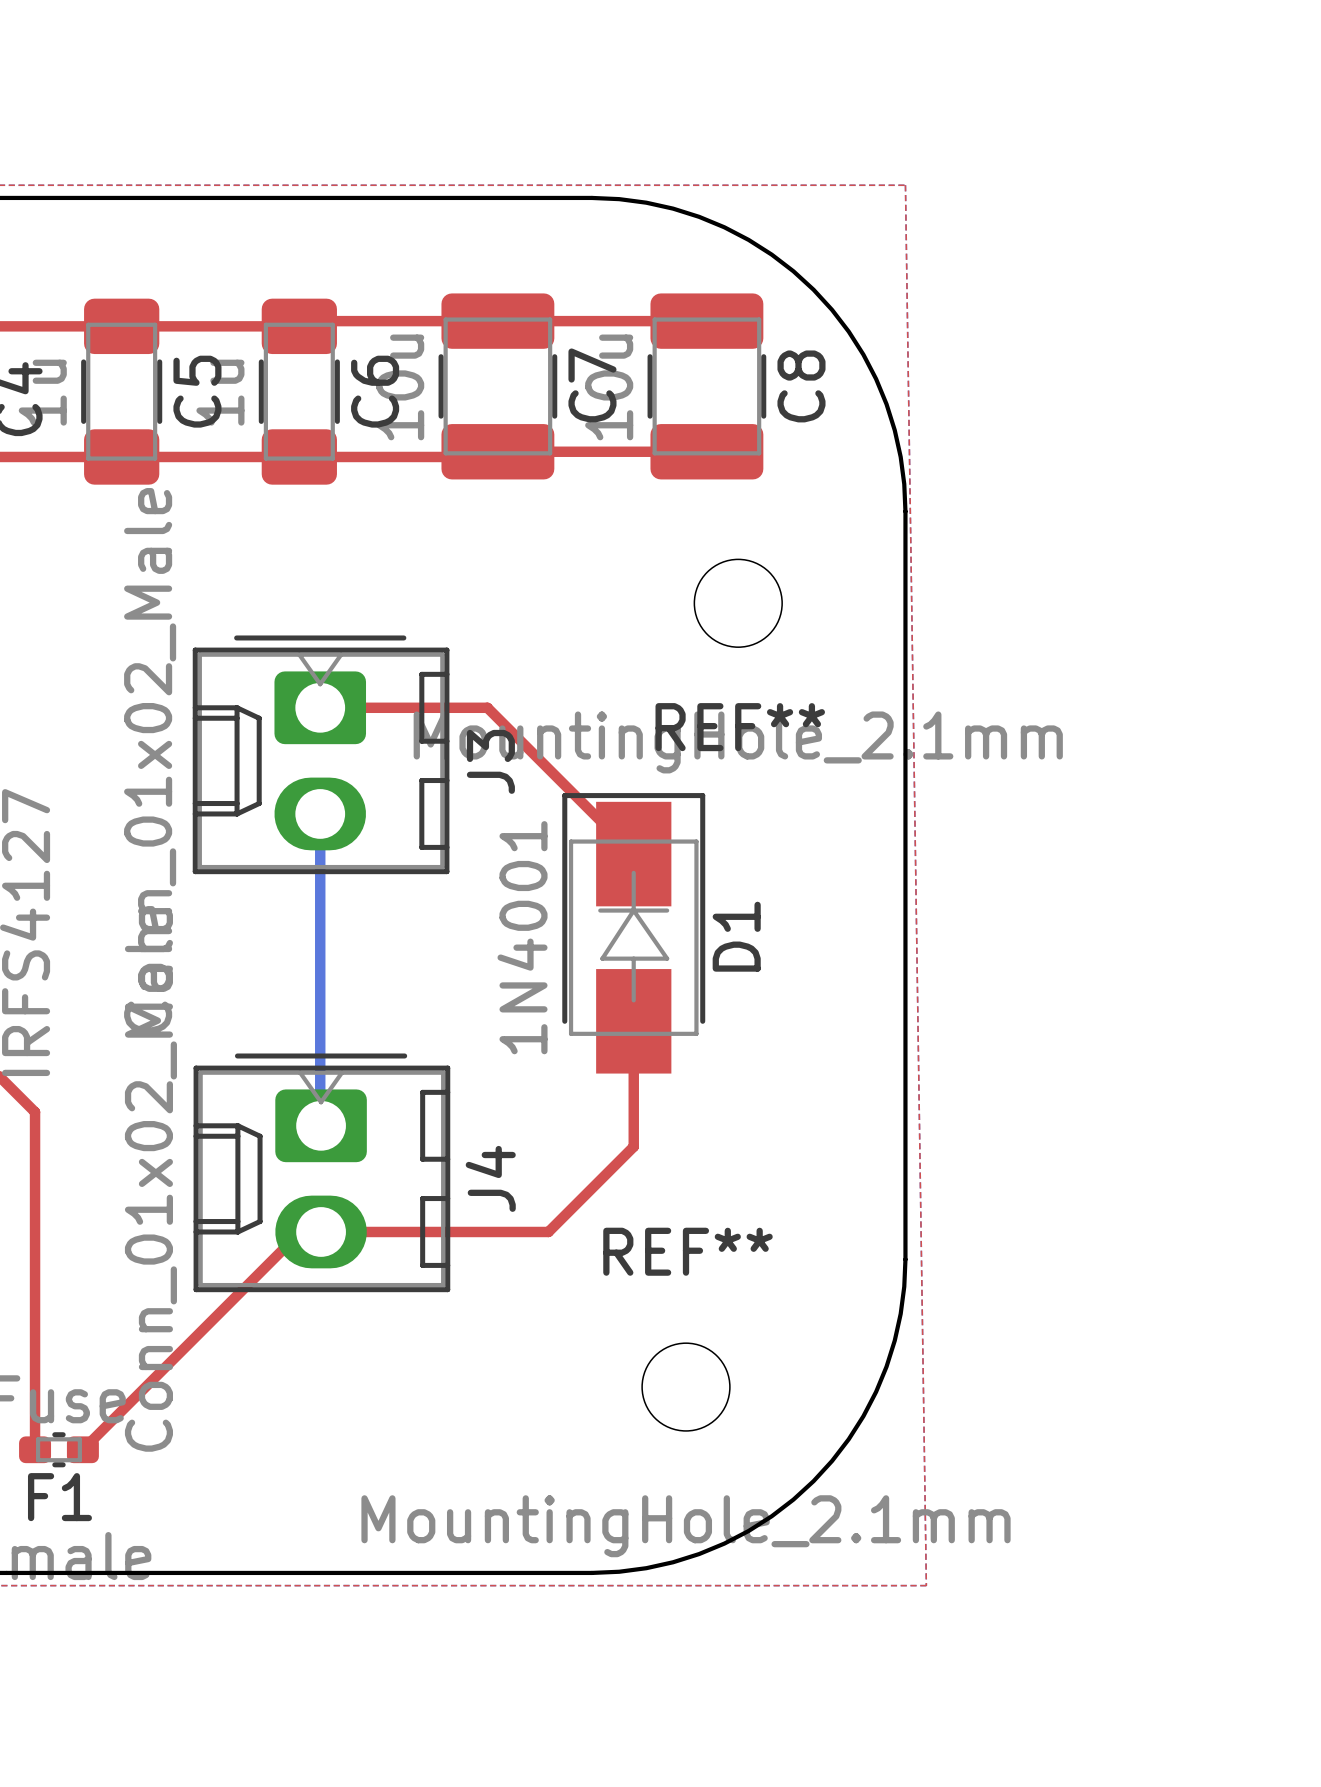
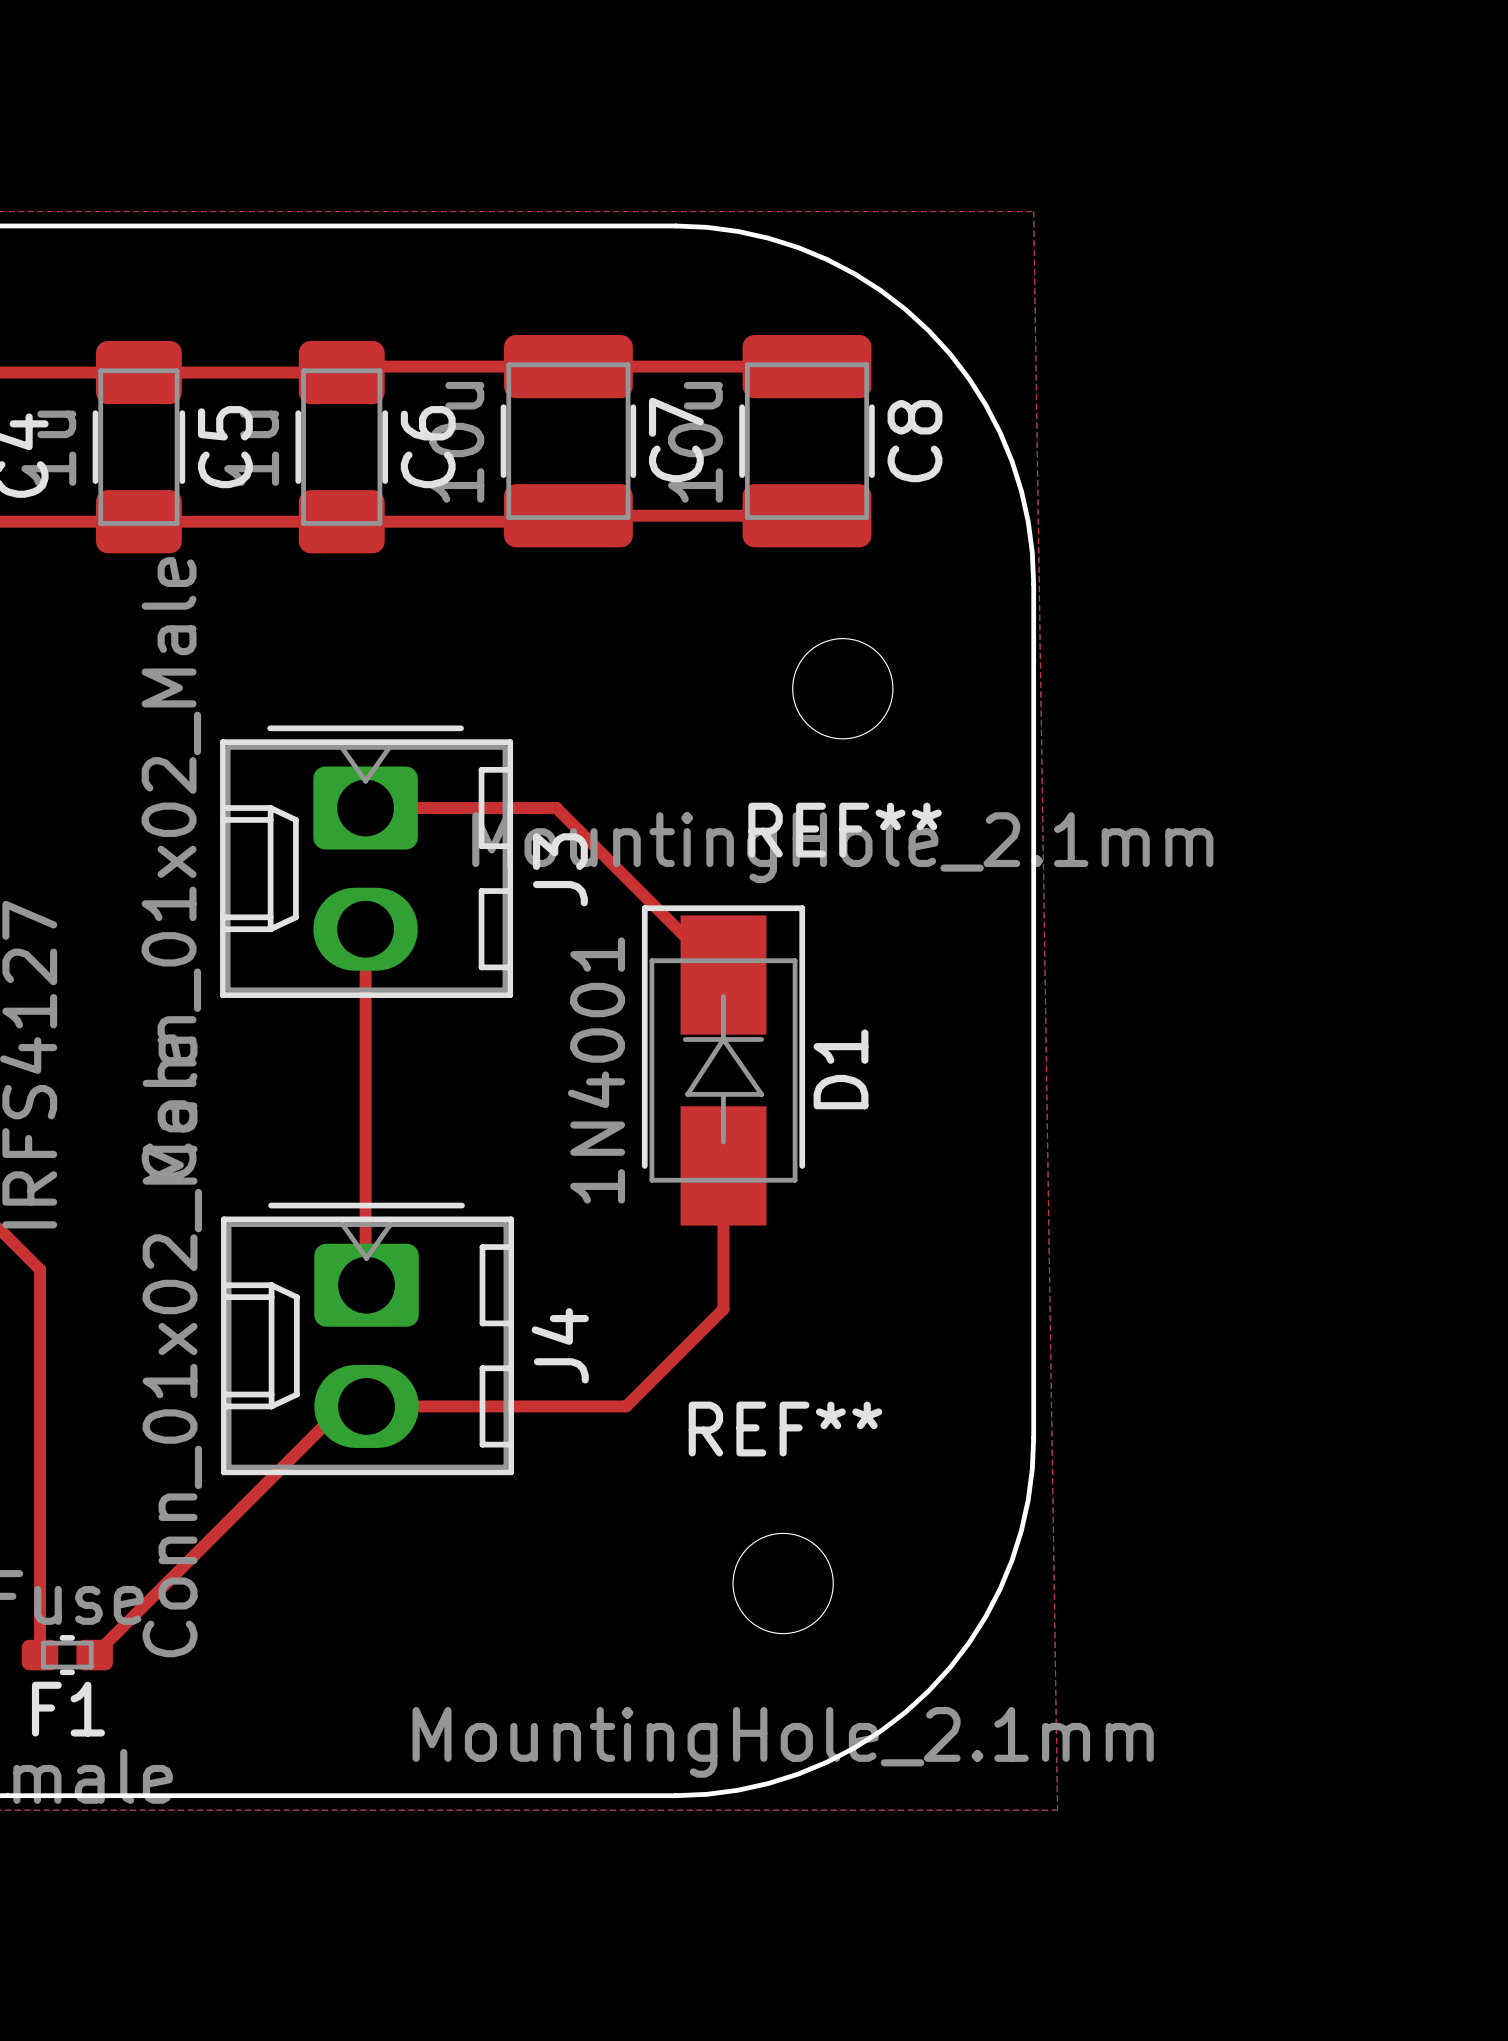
top track: none -> (365, 929) (366, 1285)
bottom track: (320, 813) (320, 1124) -> none

